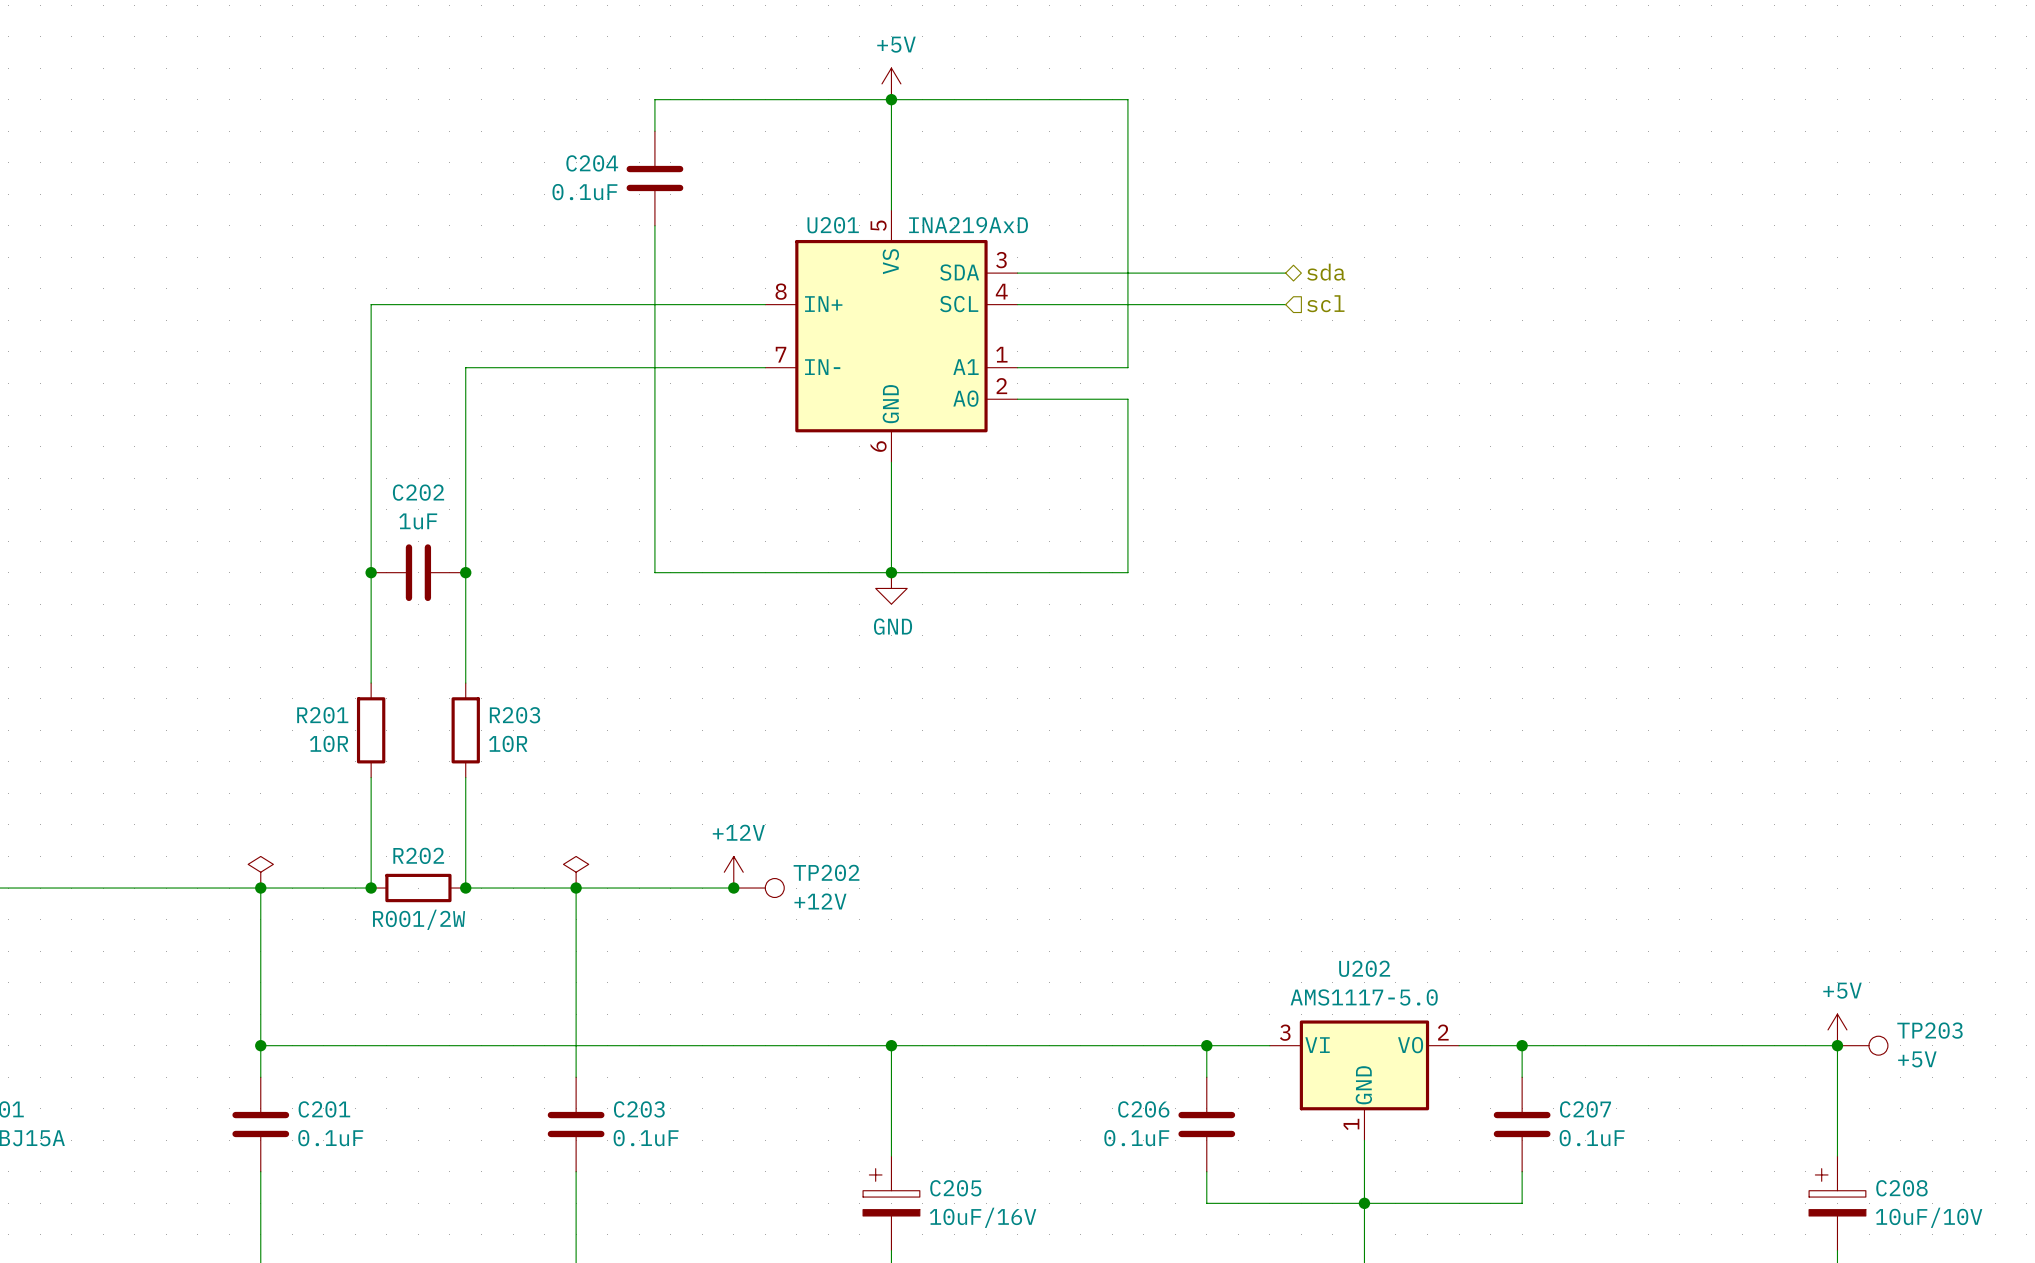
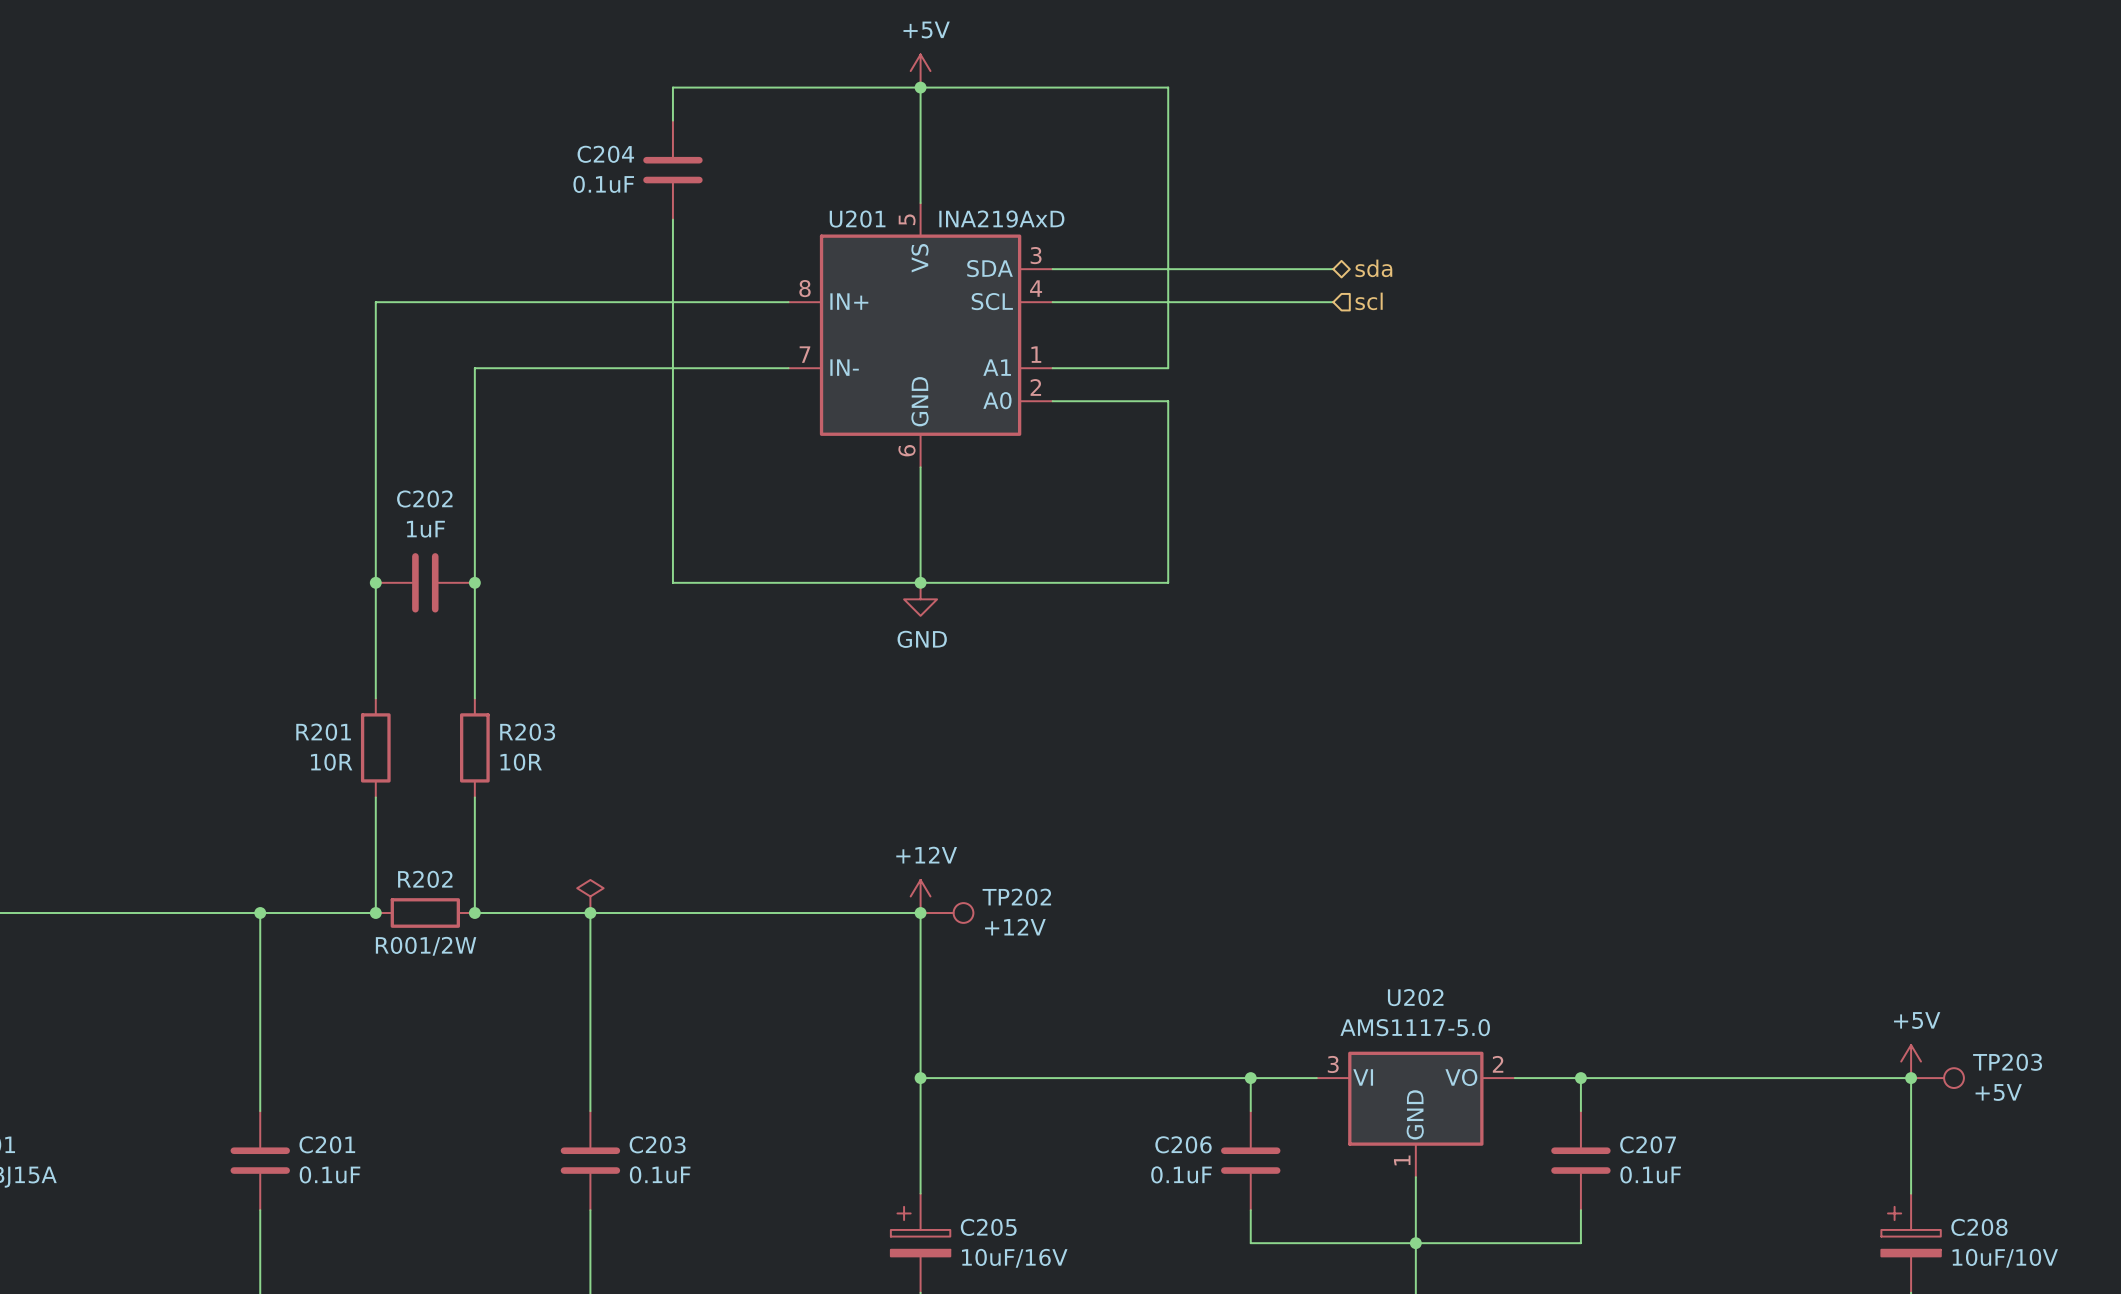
power symbol: (260, 872) -> none
power symbol position: +12V (733, 872) -> +12V (920, 896)
junction: (733, 888) -> none
TP202 position: (759, 888) -> (946, 913)
junction: none -> (920, 913)
wire: (260, 1045) (891, 1045) -> (755, 913) (920, 913) (920, 1078)
junction: (260, 1045) -> none

